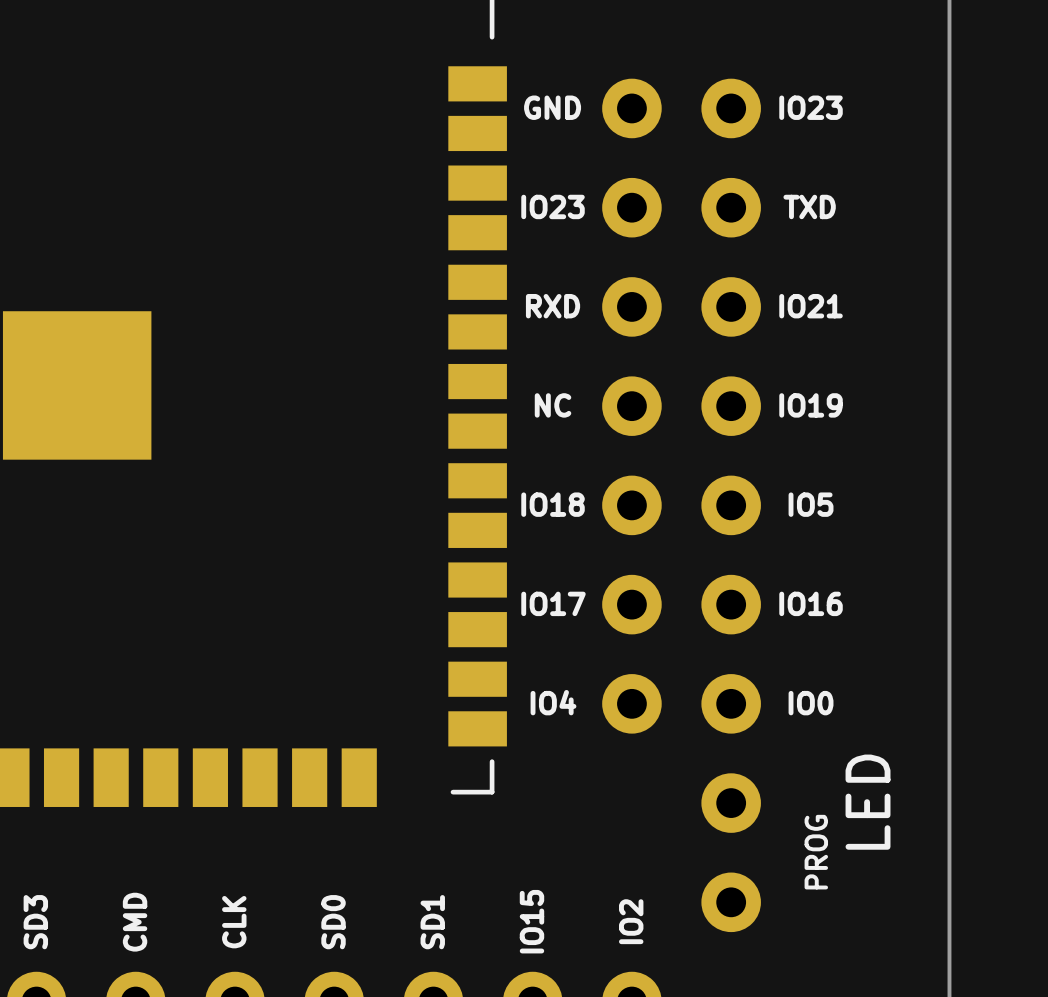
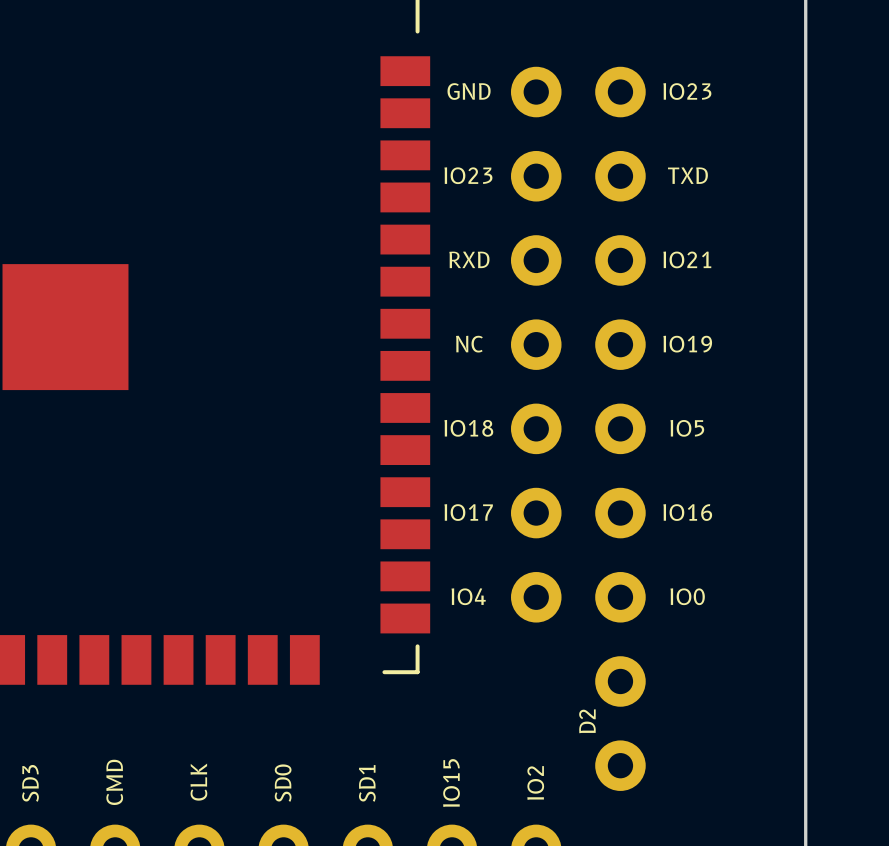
PROG value: LED (868, 802) -> none
PROG name: PROG (816, 852) -> D2 (587, 721)

